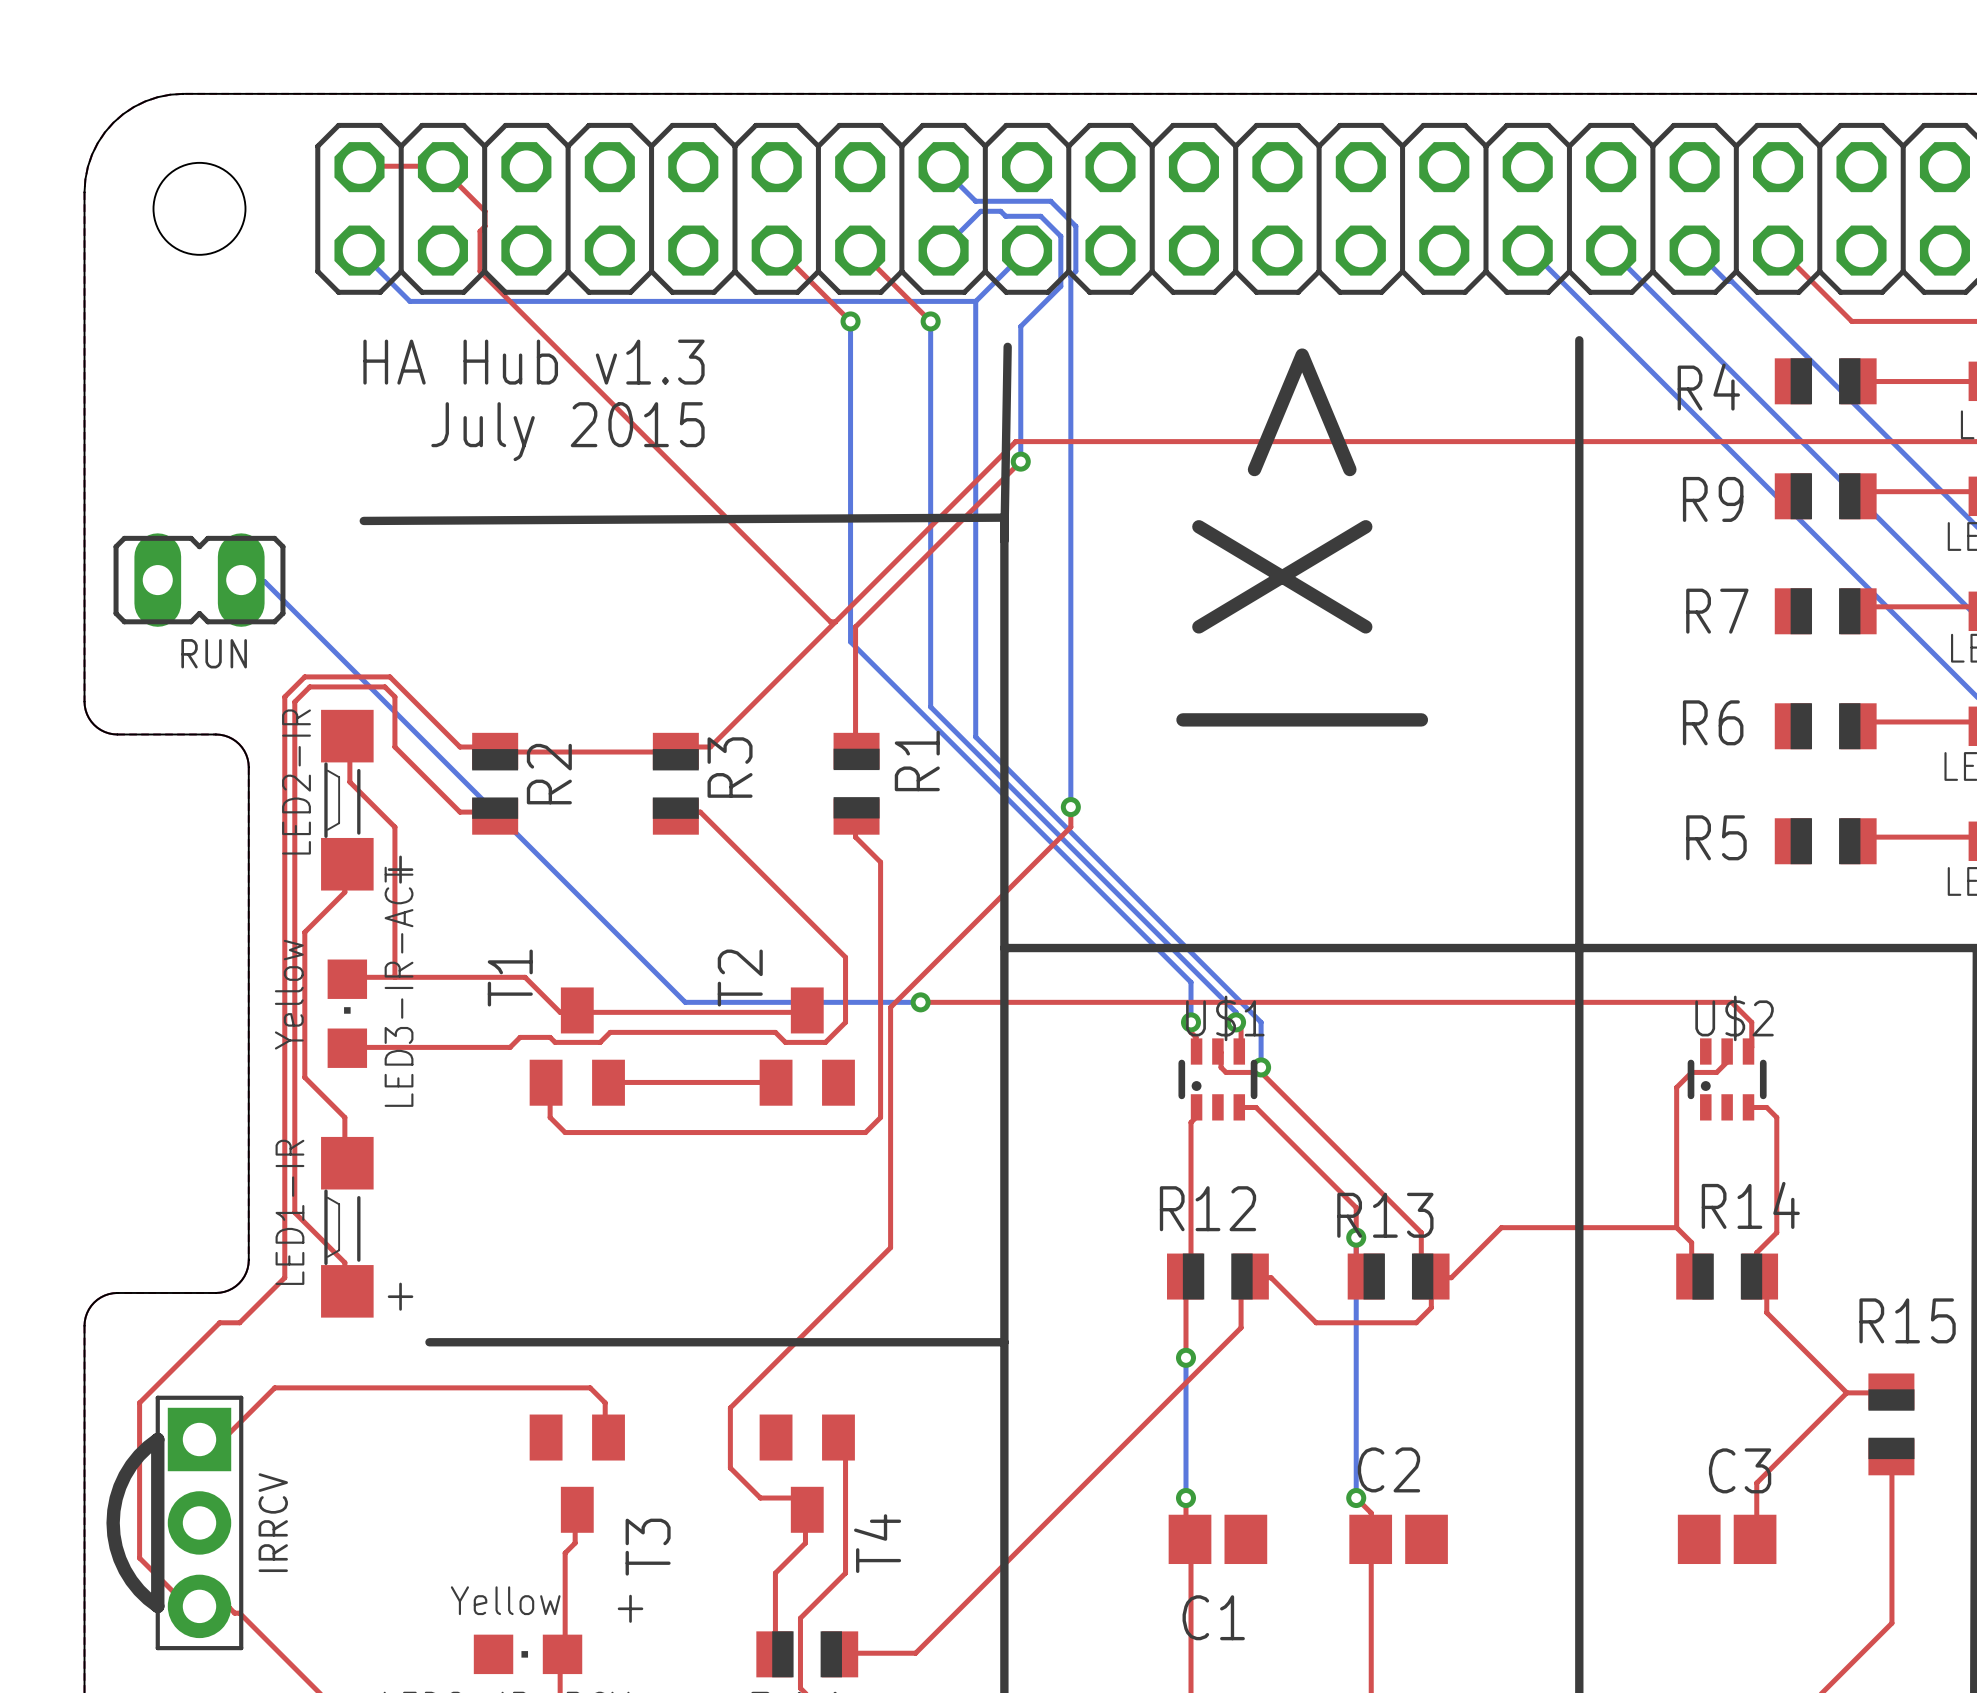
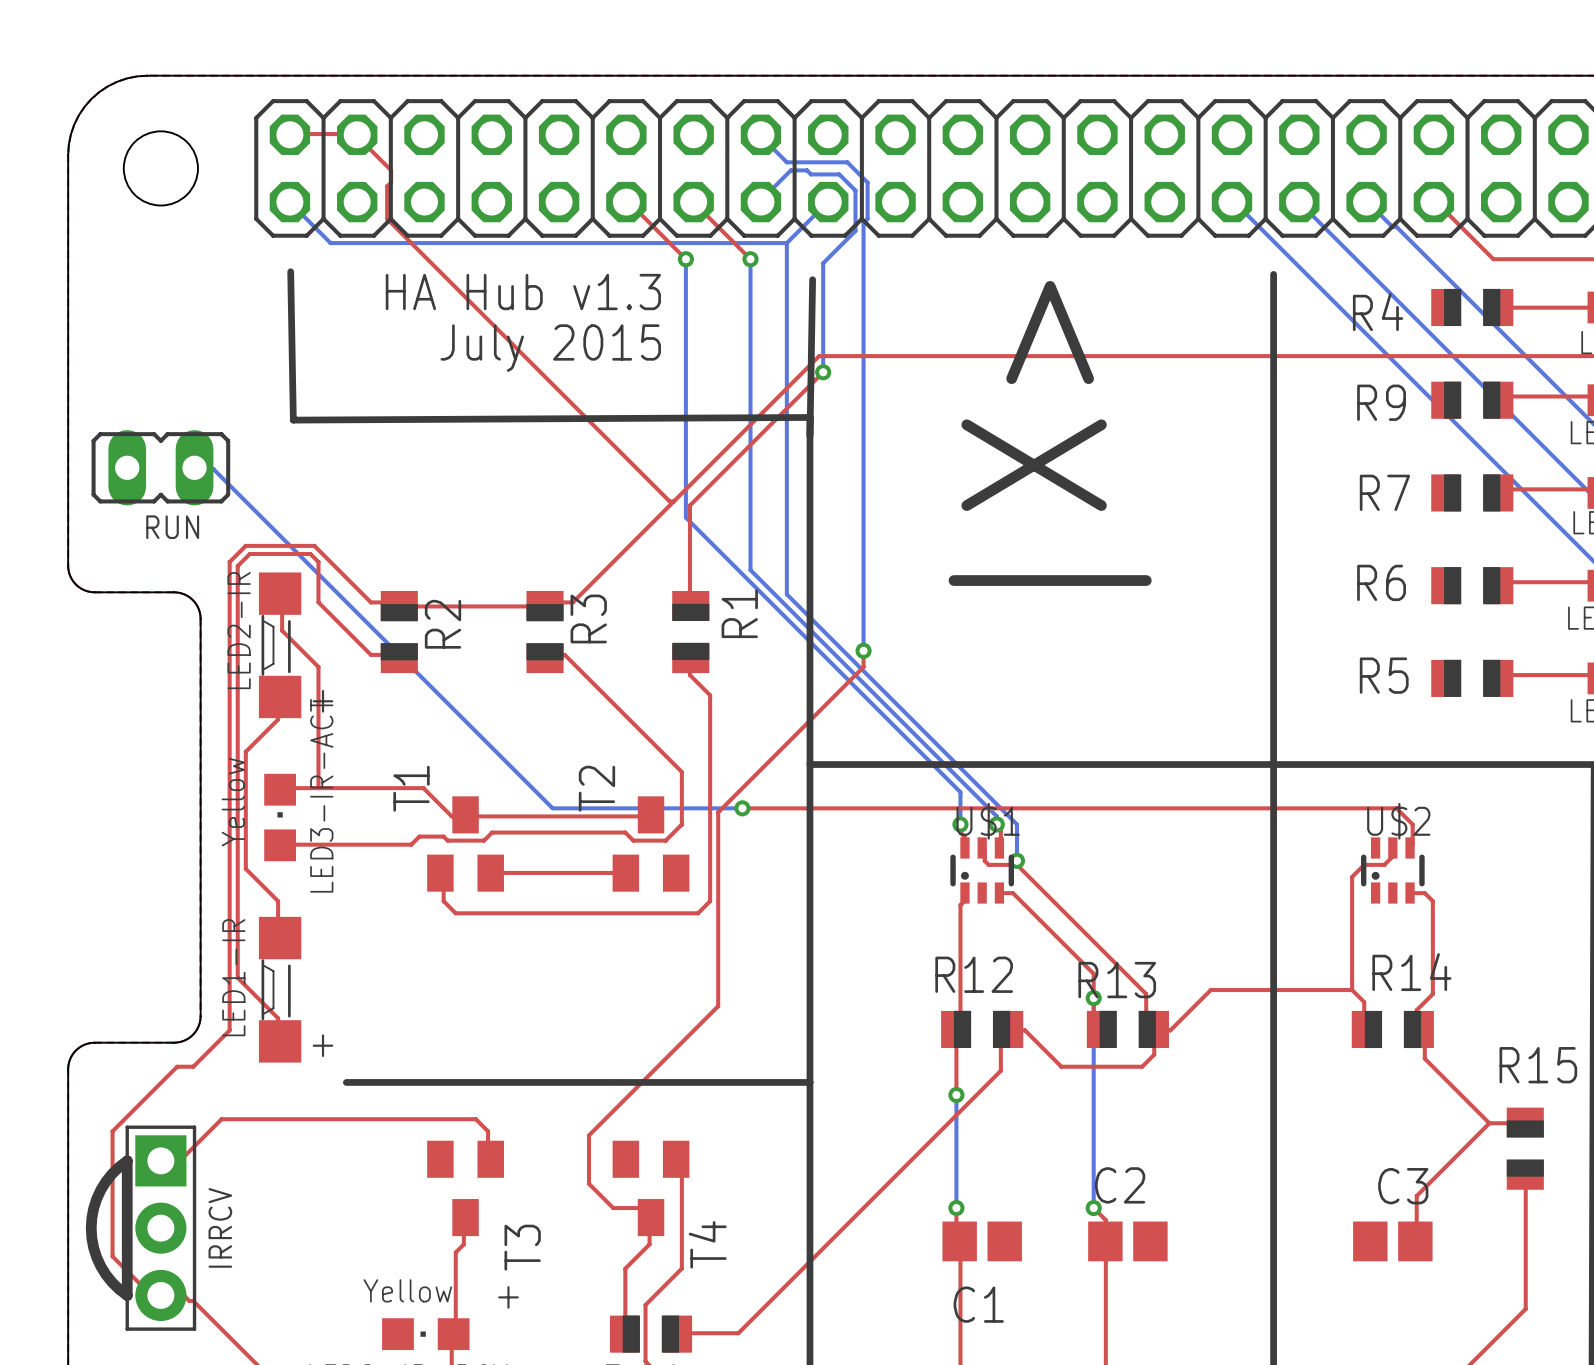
line: none -> (290, 271) (293, 420)
text position: HA Hub v1.3 (534, 362) -> HA Hub v1.3 (523, 292)
text position: July 2015 (567, 431) -> July 2015 (550, 348)

